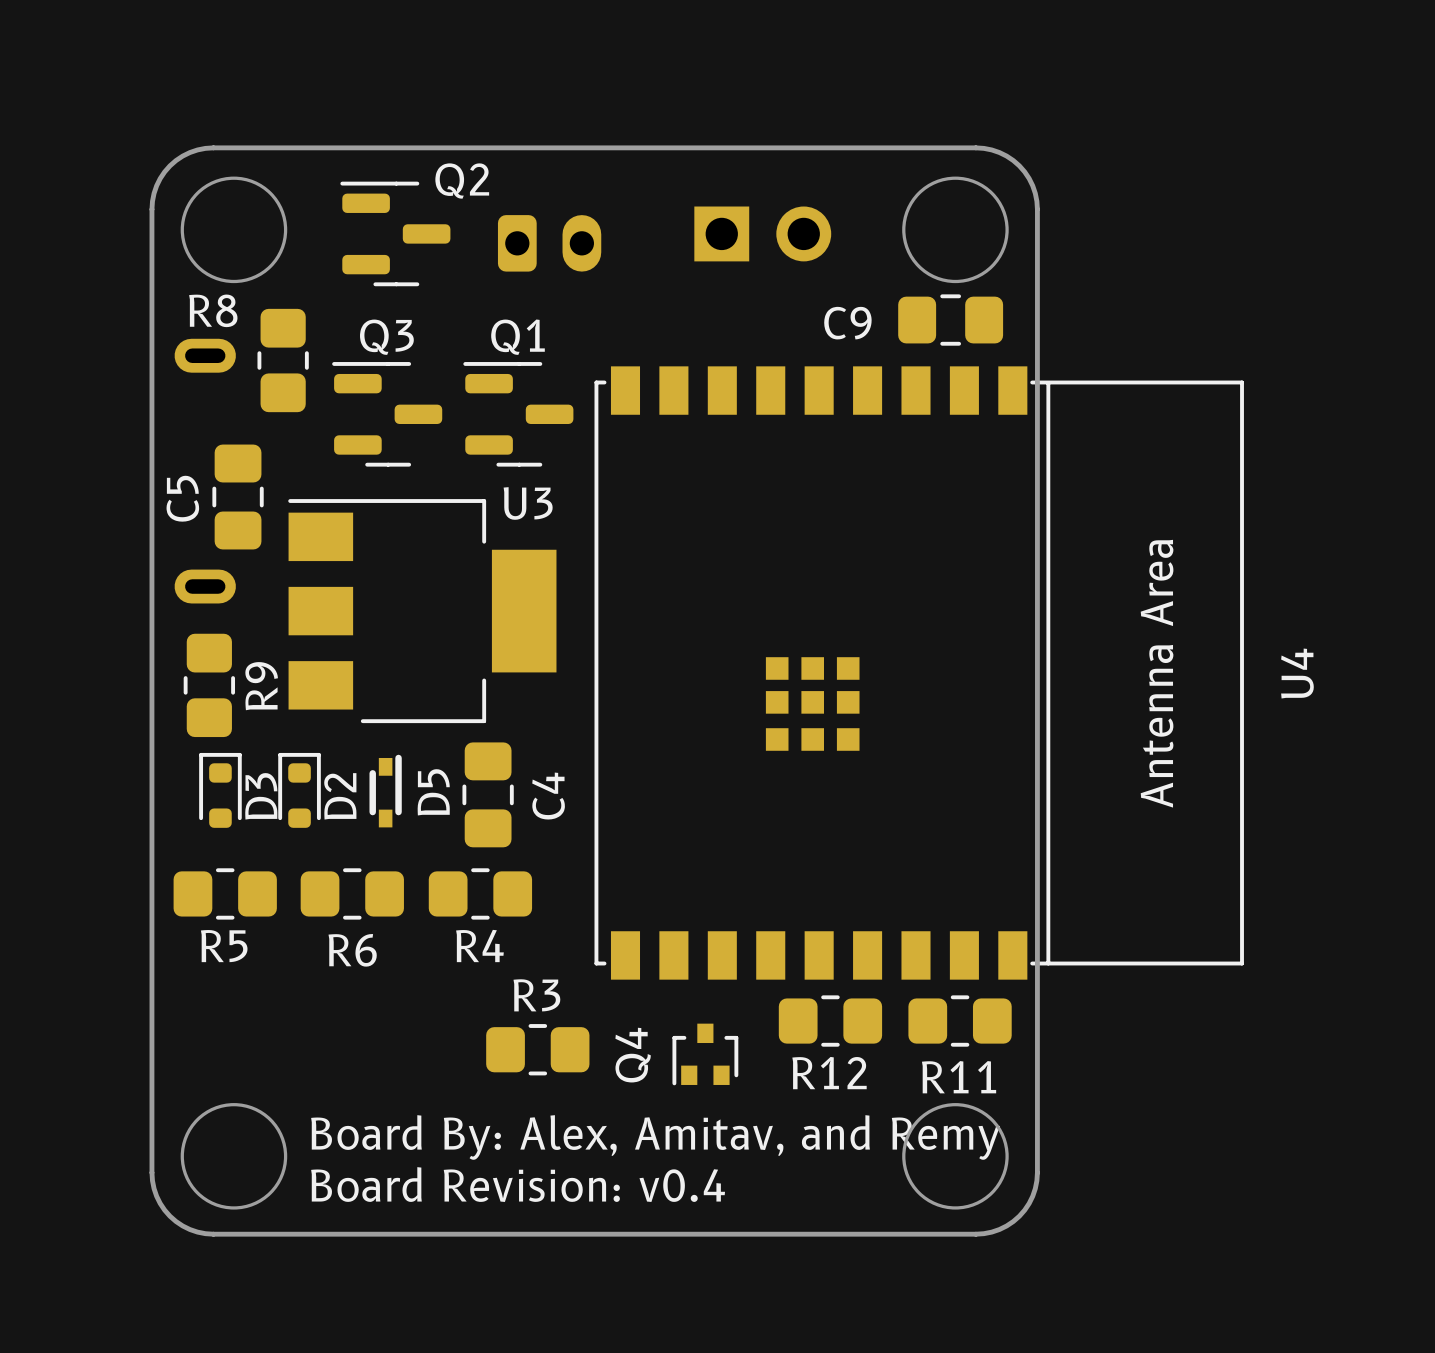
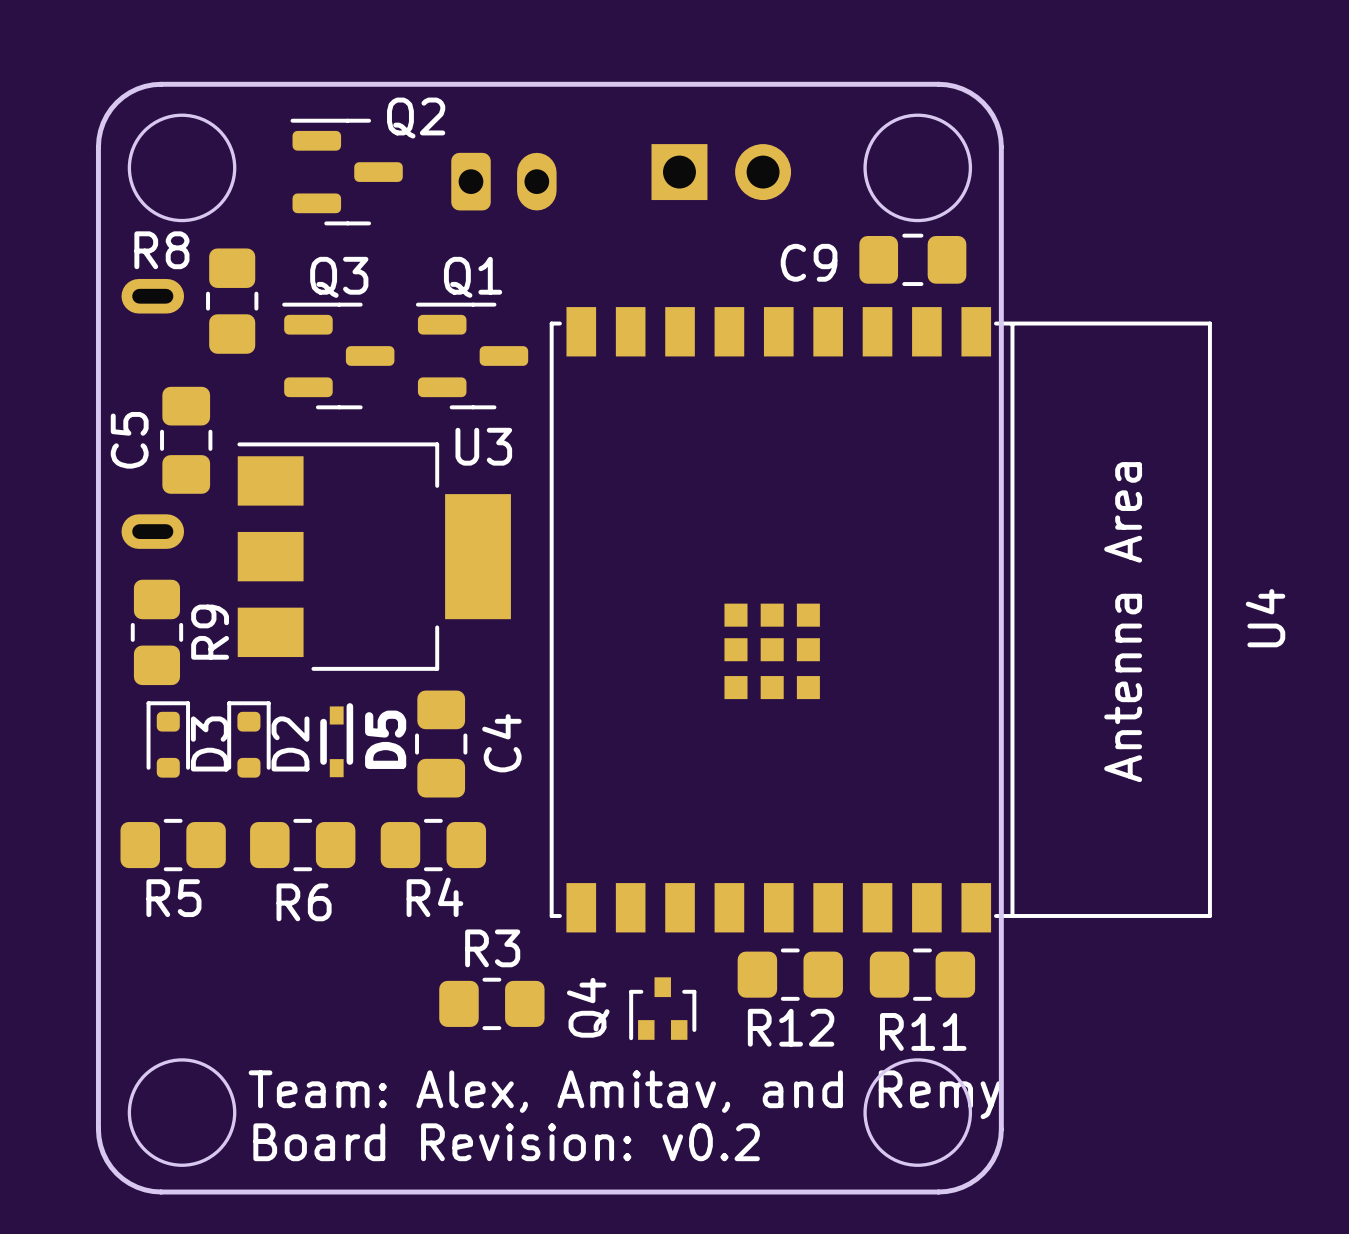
text: Board By: Alex, Amitav, and Remy (655, 1137) -> Team: Alex, Amitav, and Remy (624, 1094)
text: Board Revision: v0.4 (518, 1184) -> Board Revision: v0.2 (506, 1142)

